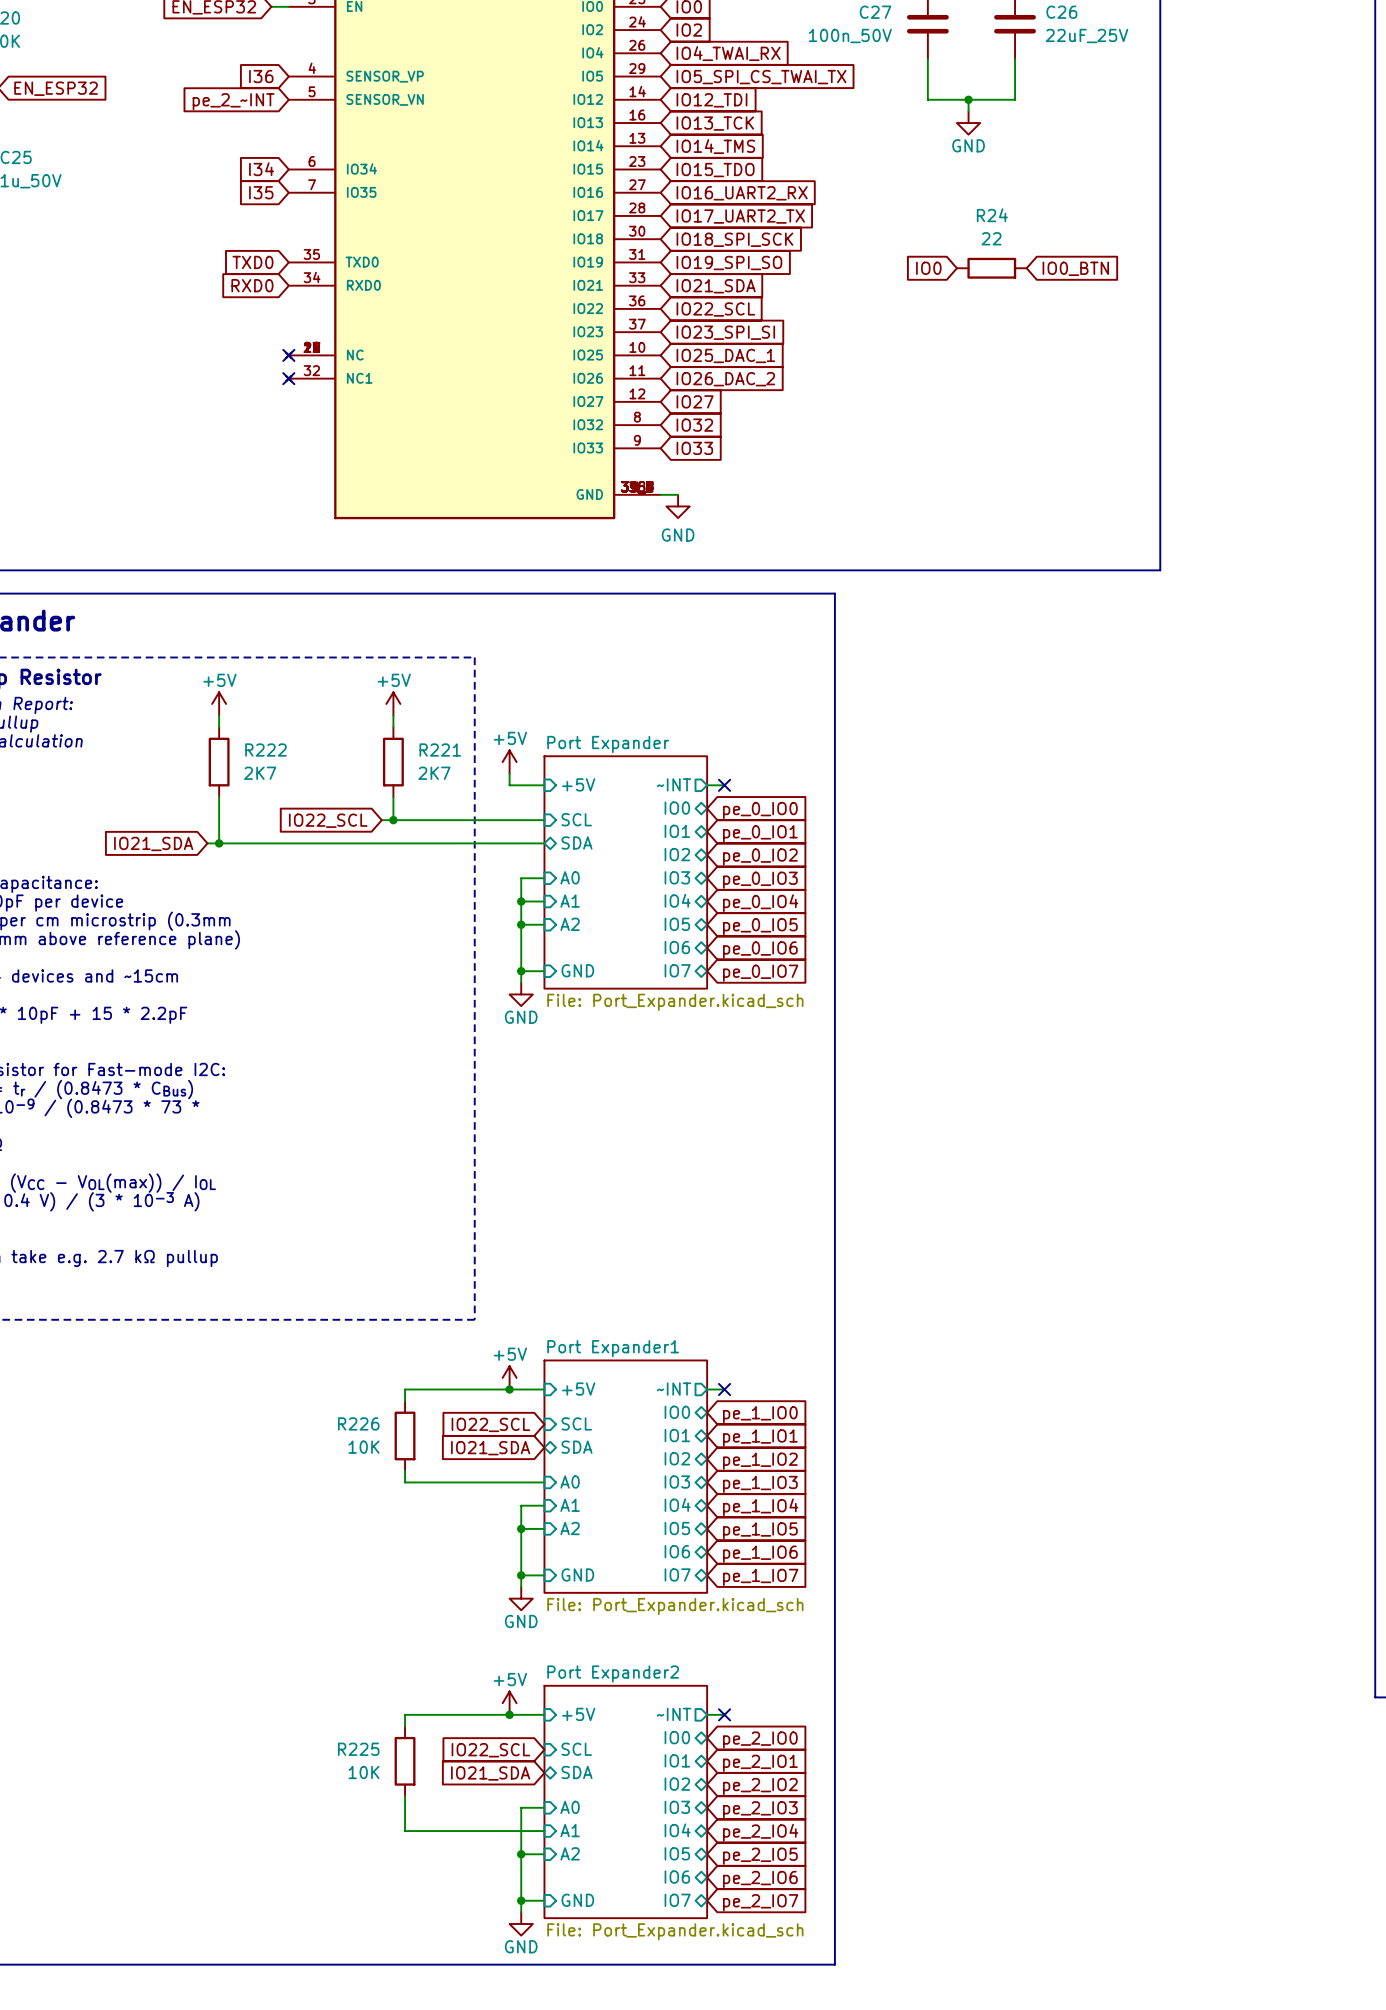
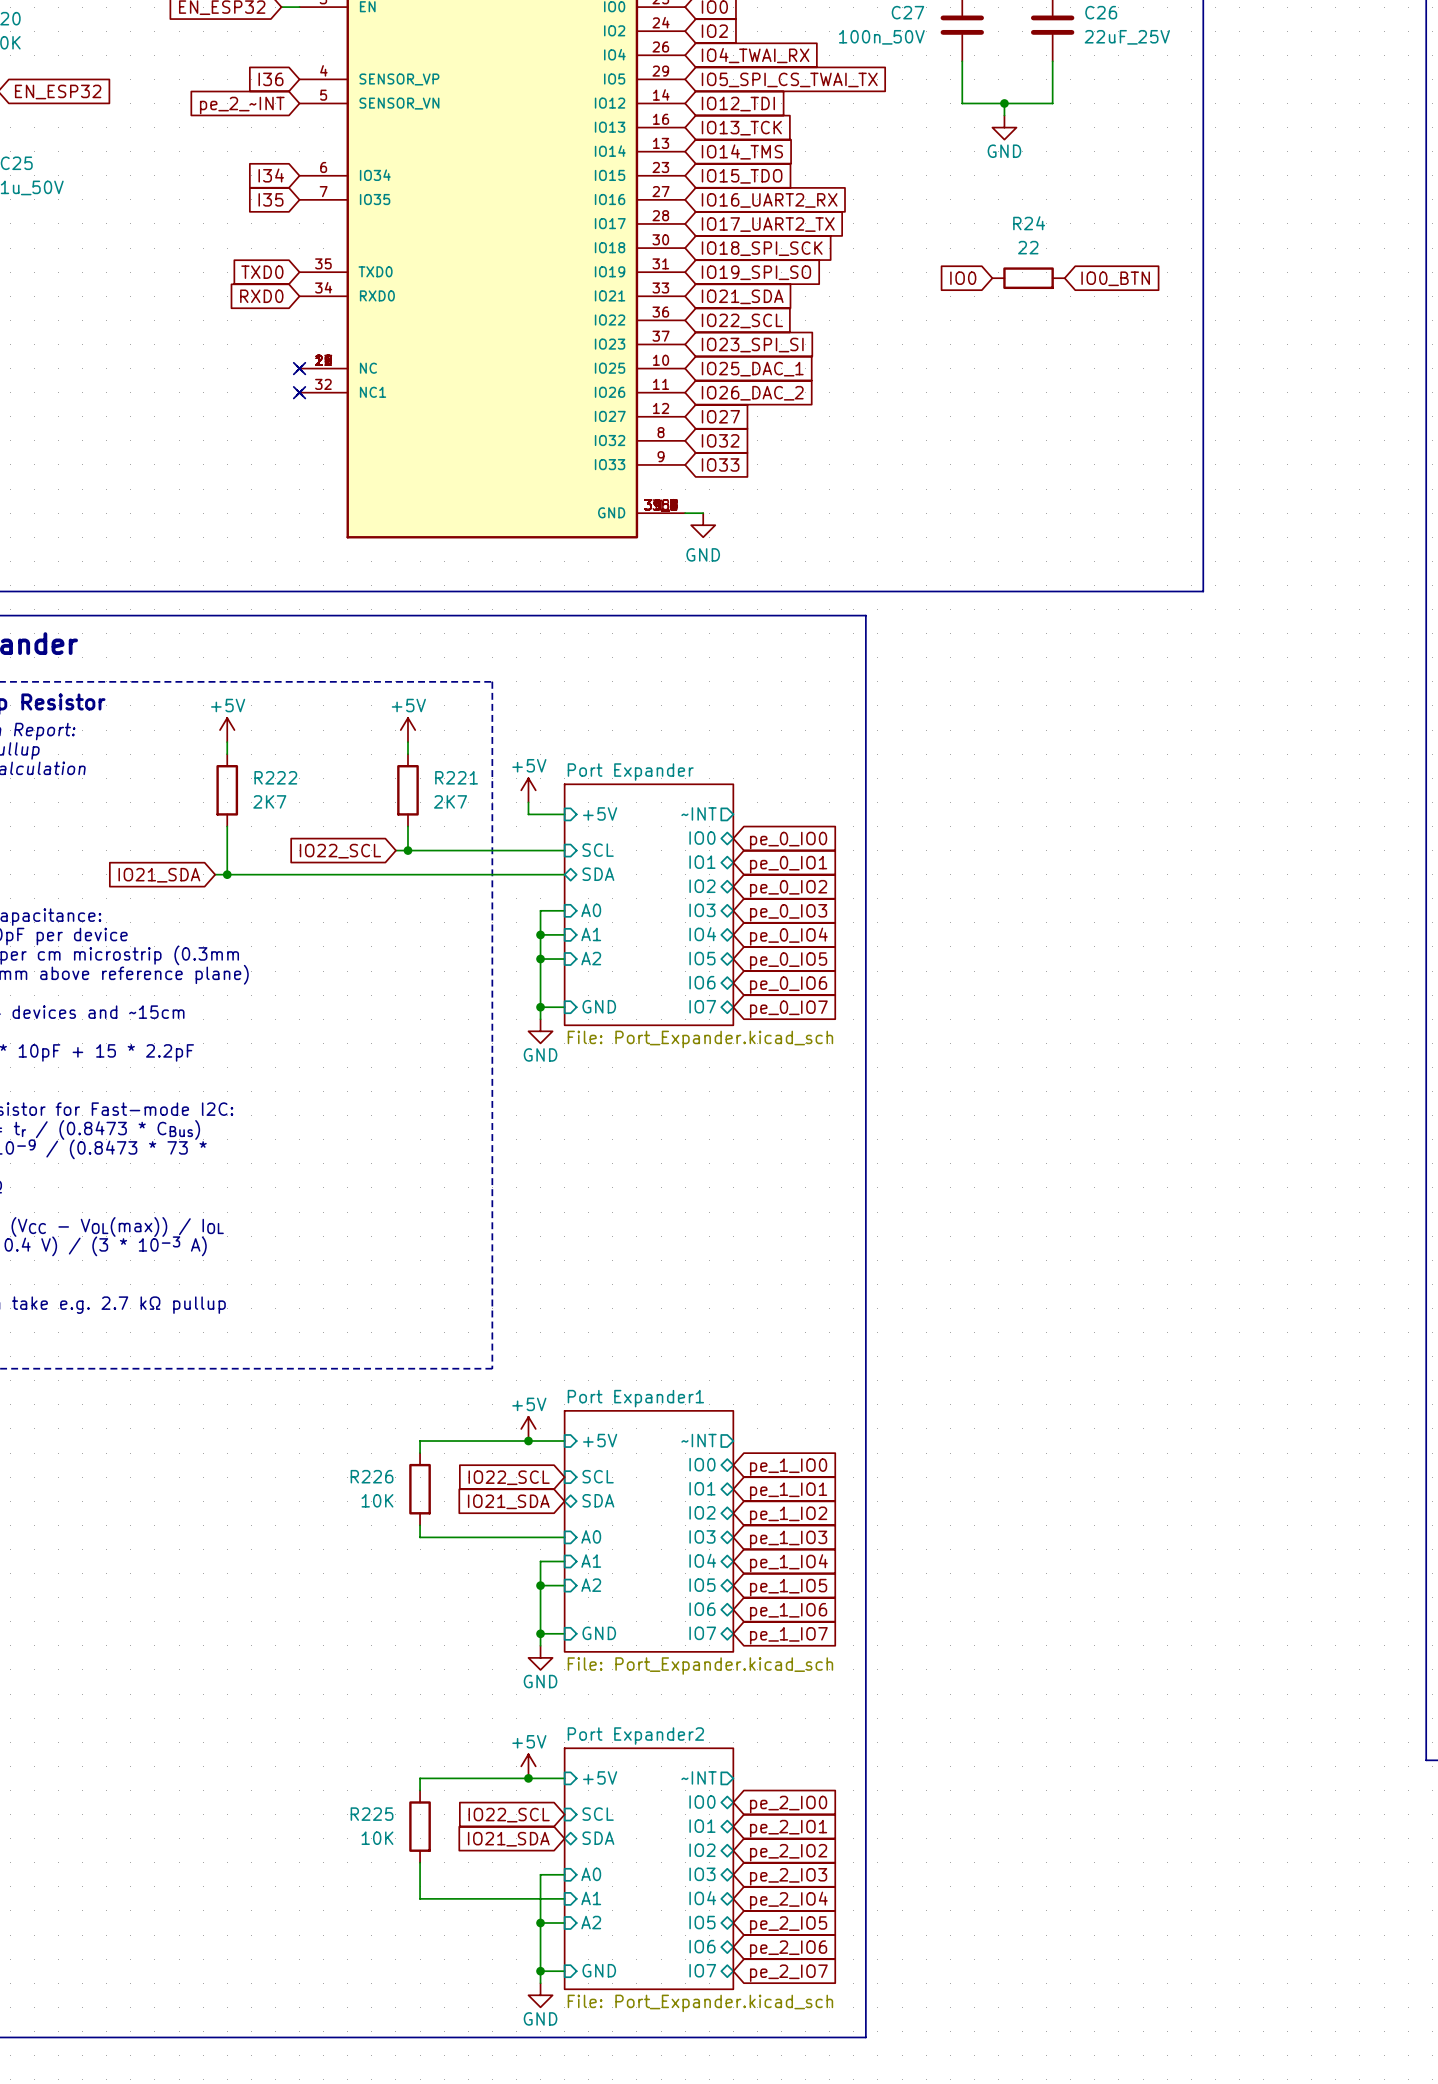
wire: (707, 785) (724, 785) -> none
no-connect mark: (724, 785) -> none
wire: (707, 1389) (724, 1389) -> none
no-connect mark: (724, 1389) -> none
wire: (707, 1714) (724, 1714) -> none
no-connect mark: (724, 1714) -> none

